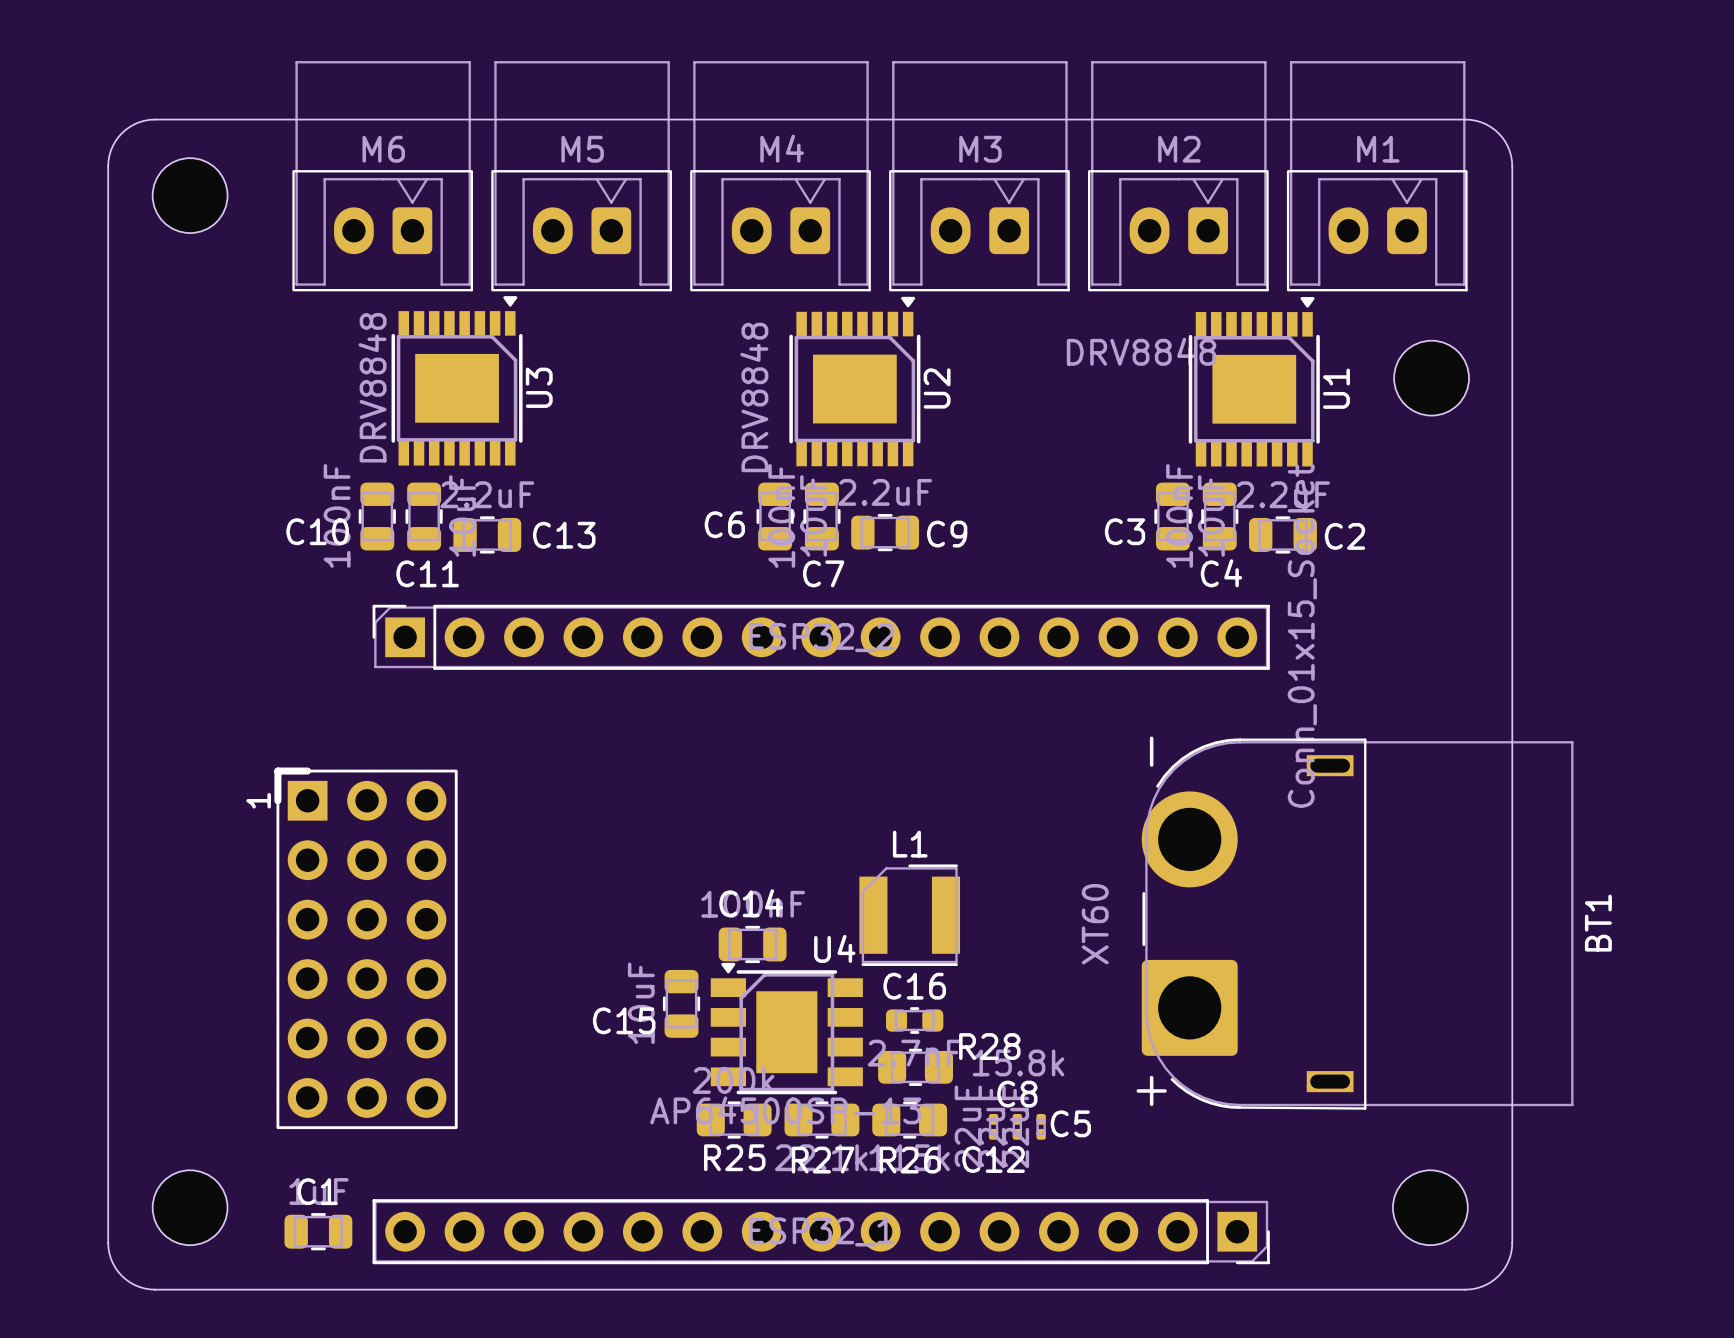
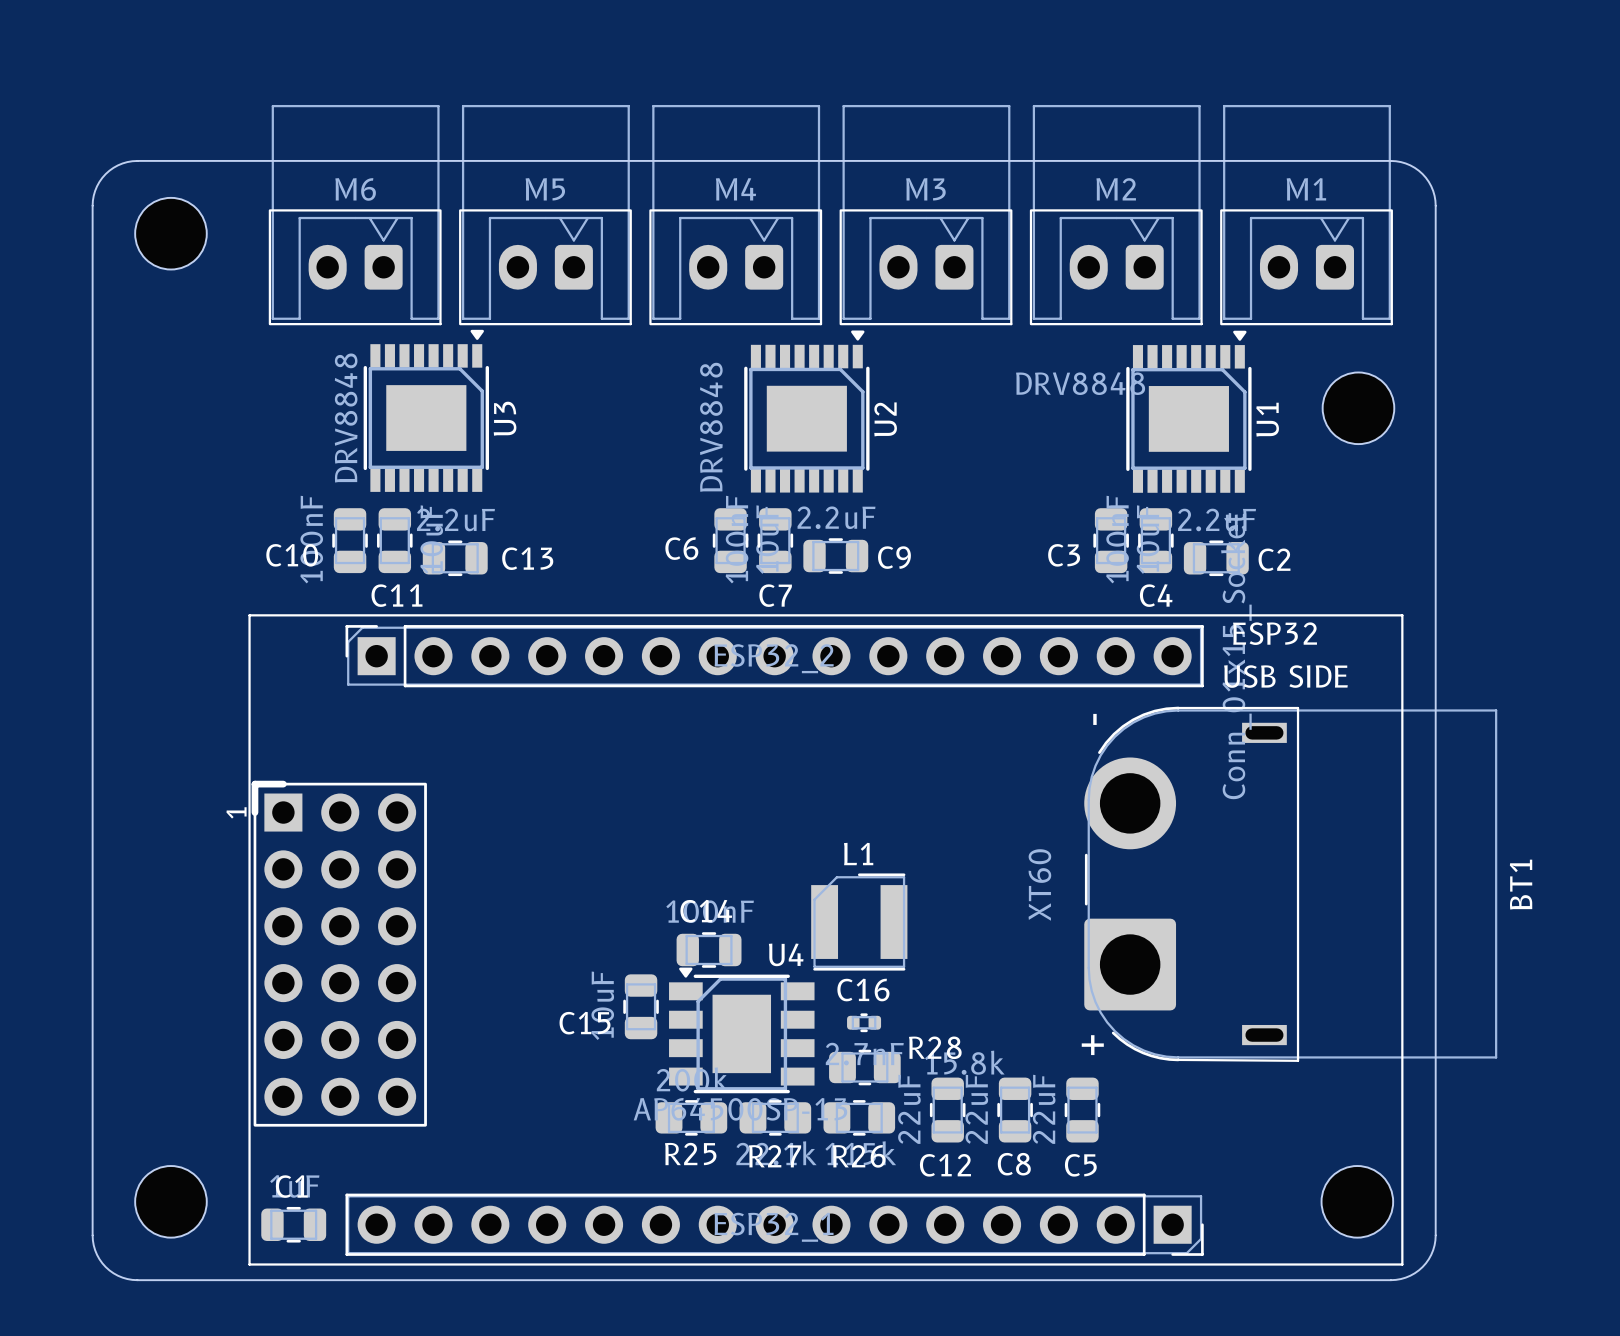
BT1 position: (1357, 923) -> (1290, 884)
ESP32: none -> (825, 939)
C16 footprint: [886, 1007, 944, 1034] -> [847, 1013, 882, 1033]
C8 name position: C8 (1017, 1094) -> C8 (1014, 1164)
C12 footprint: [988, 1113, 999, 1140] -> [929, 1077, 966, 1143]
C5 footprint: [1012, 1113, 1023, 1140] -> [1064, 1077, 1101, 1143]
C8 footprint: [1036, 1113, 1046, 1140] -> [997, 1077, 1033, 1143]
C5 name position: C5 (1070, 1123) -> C5 (1080, 1165)

